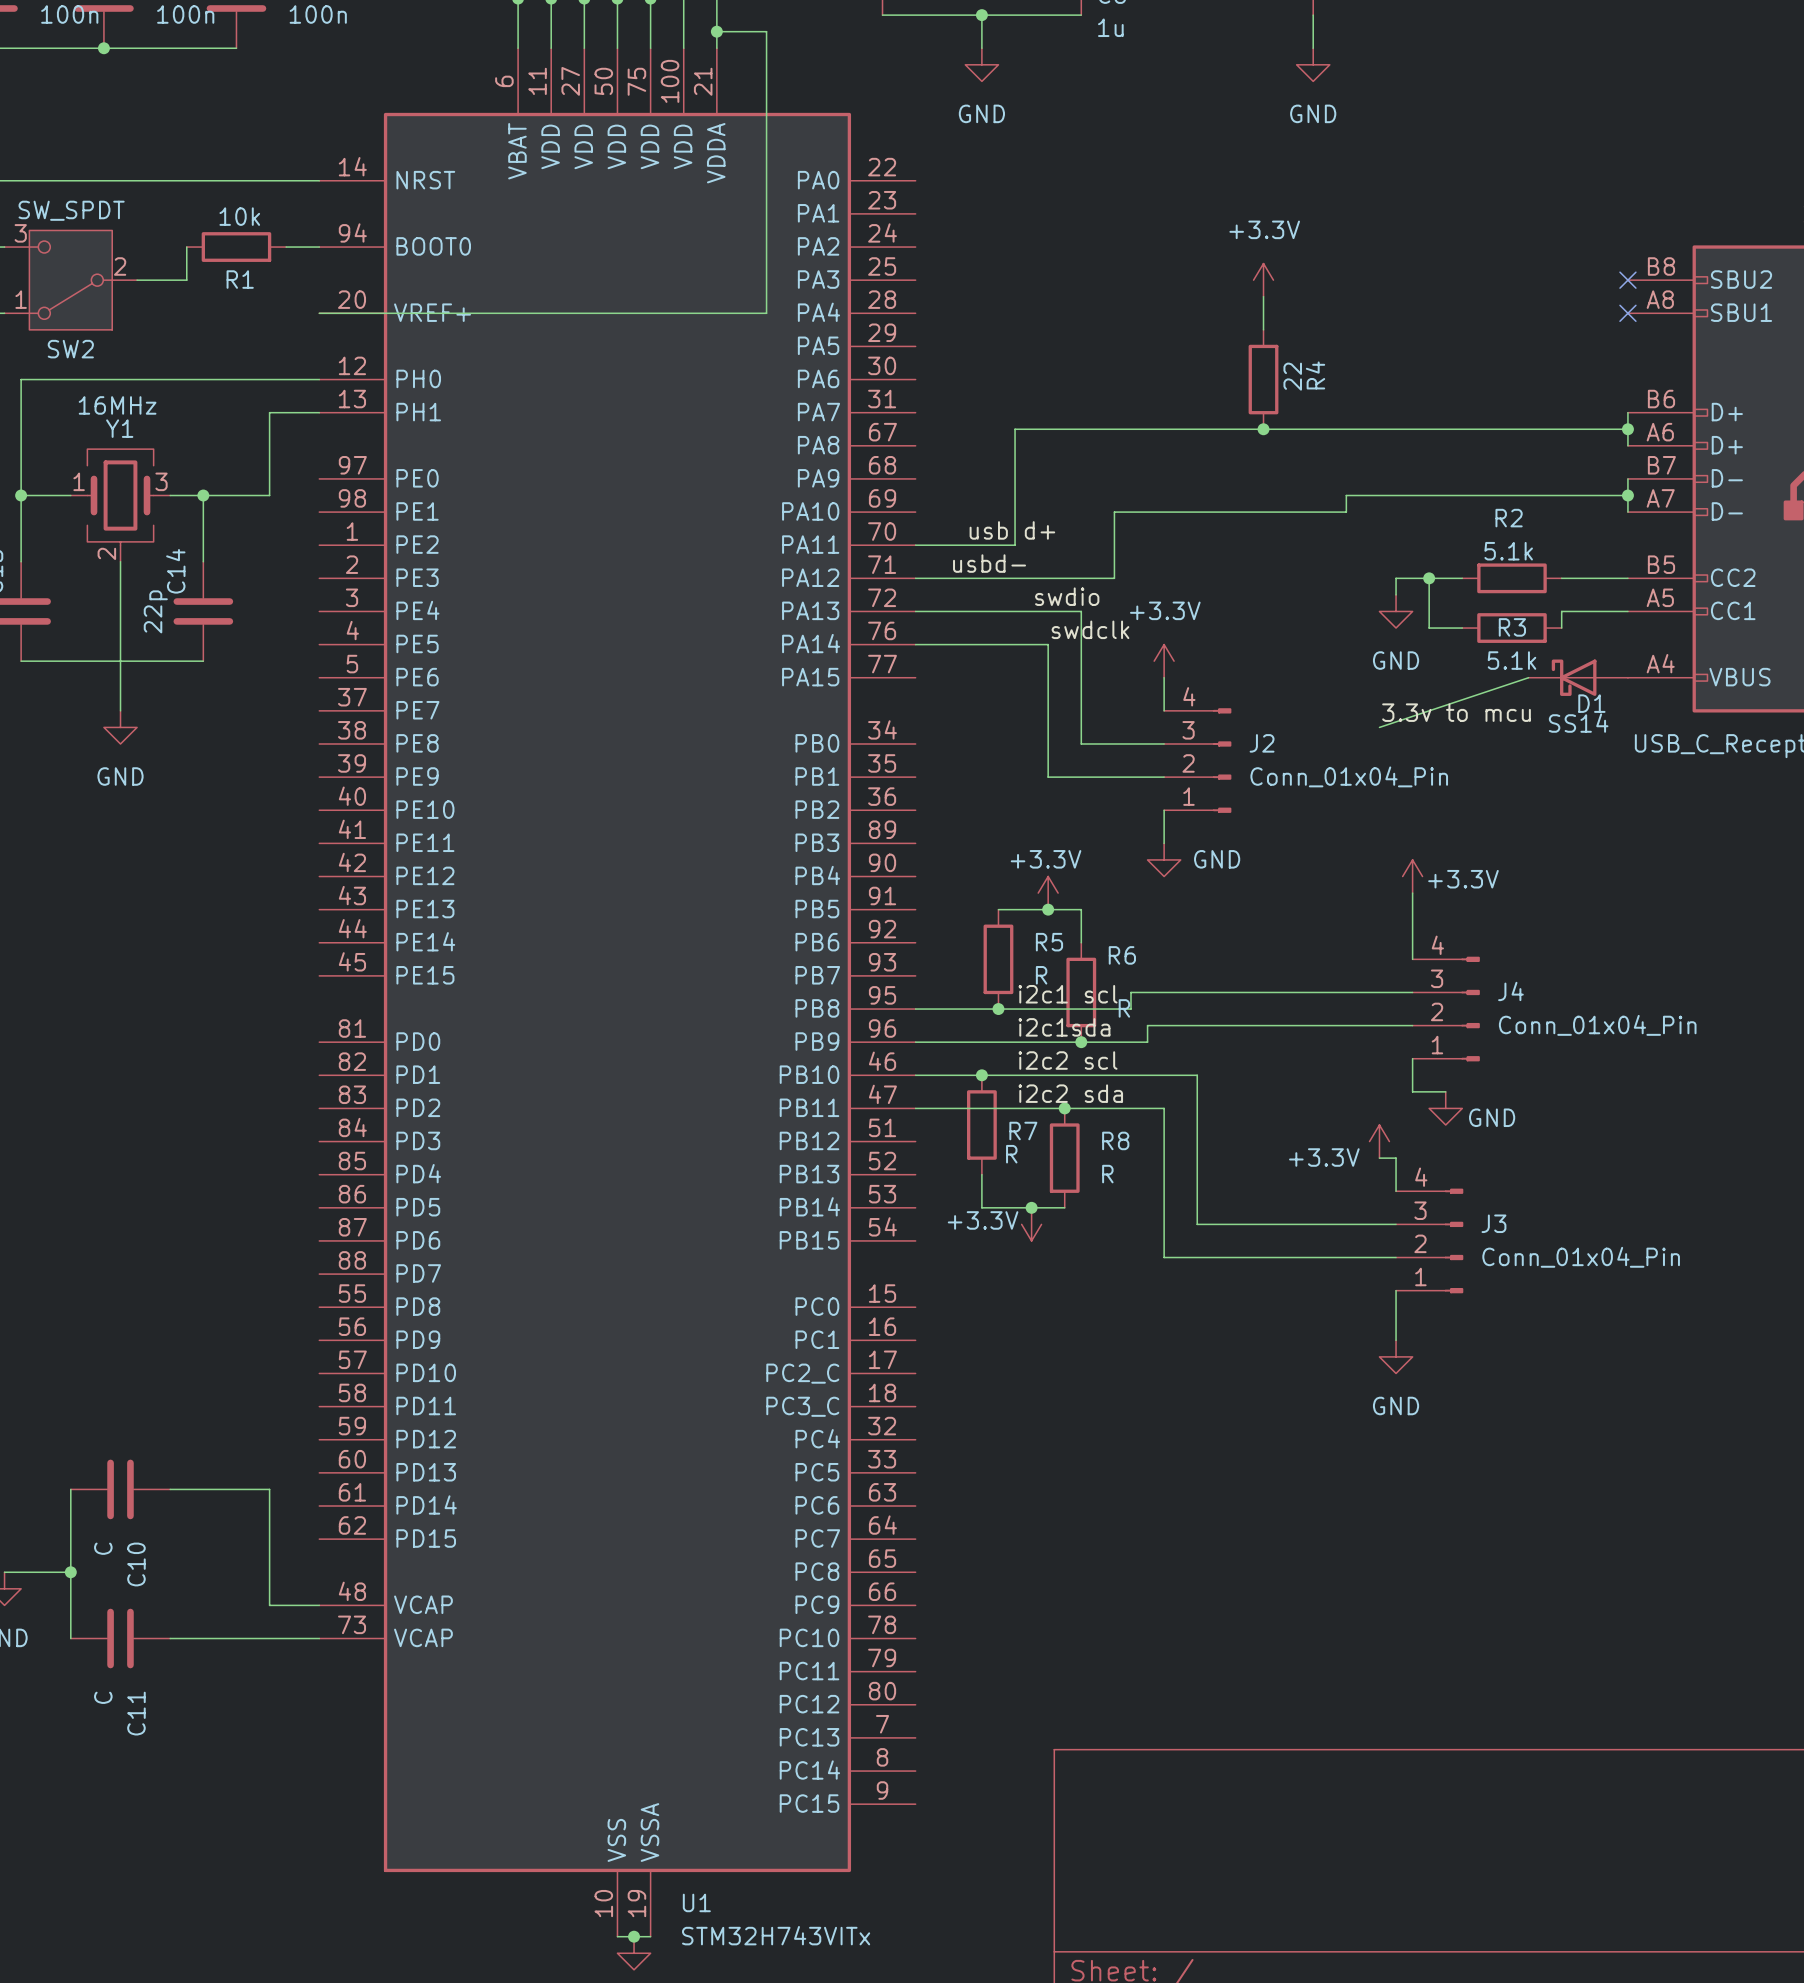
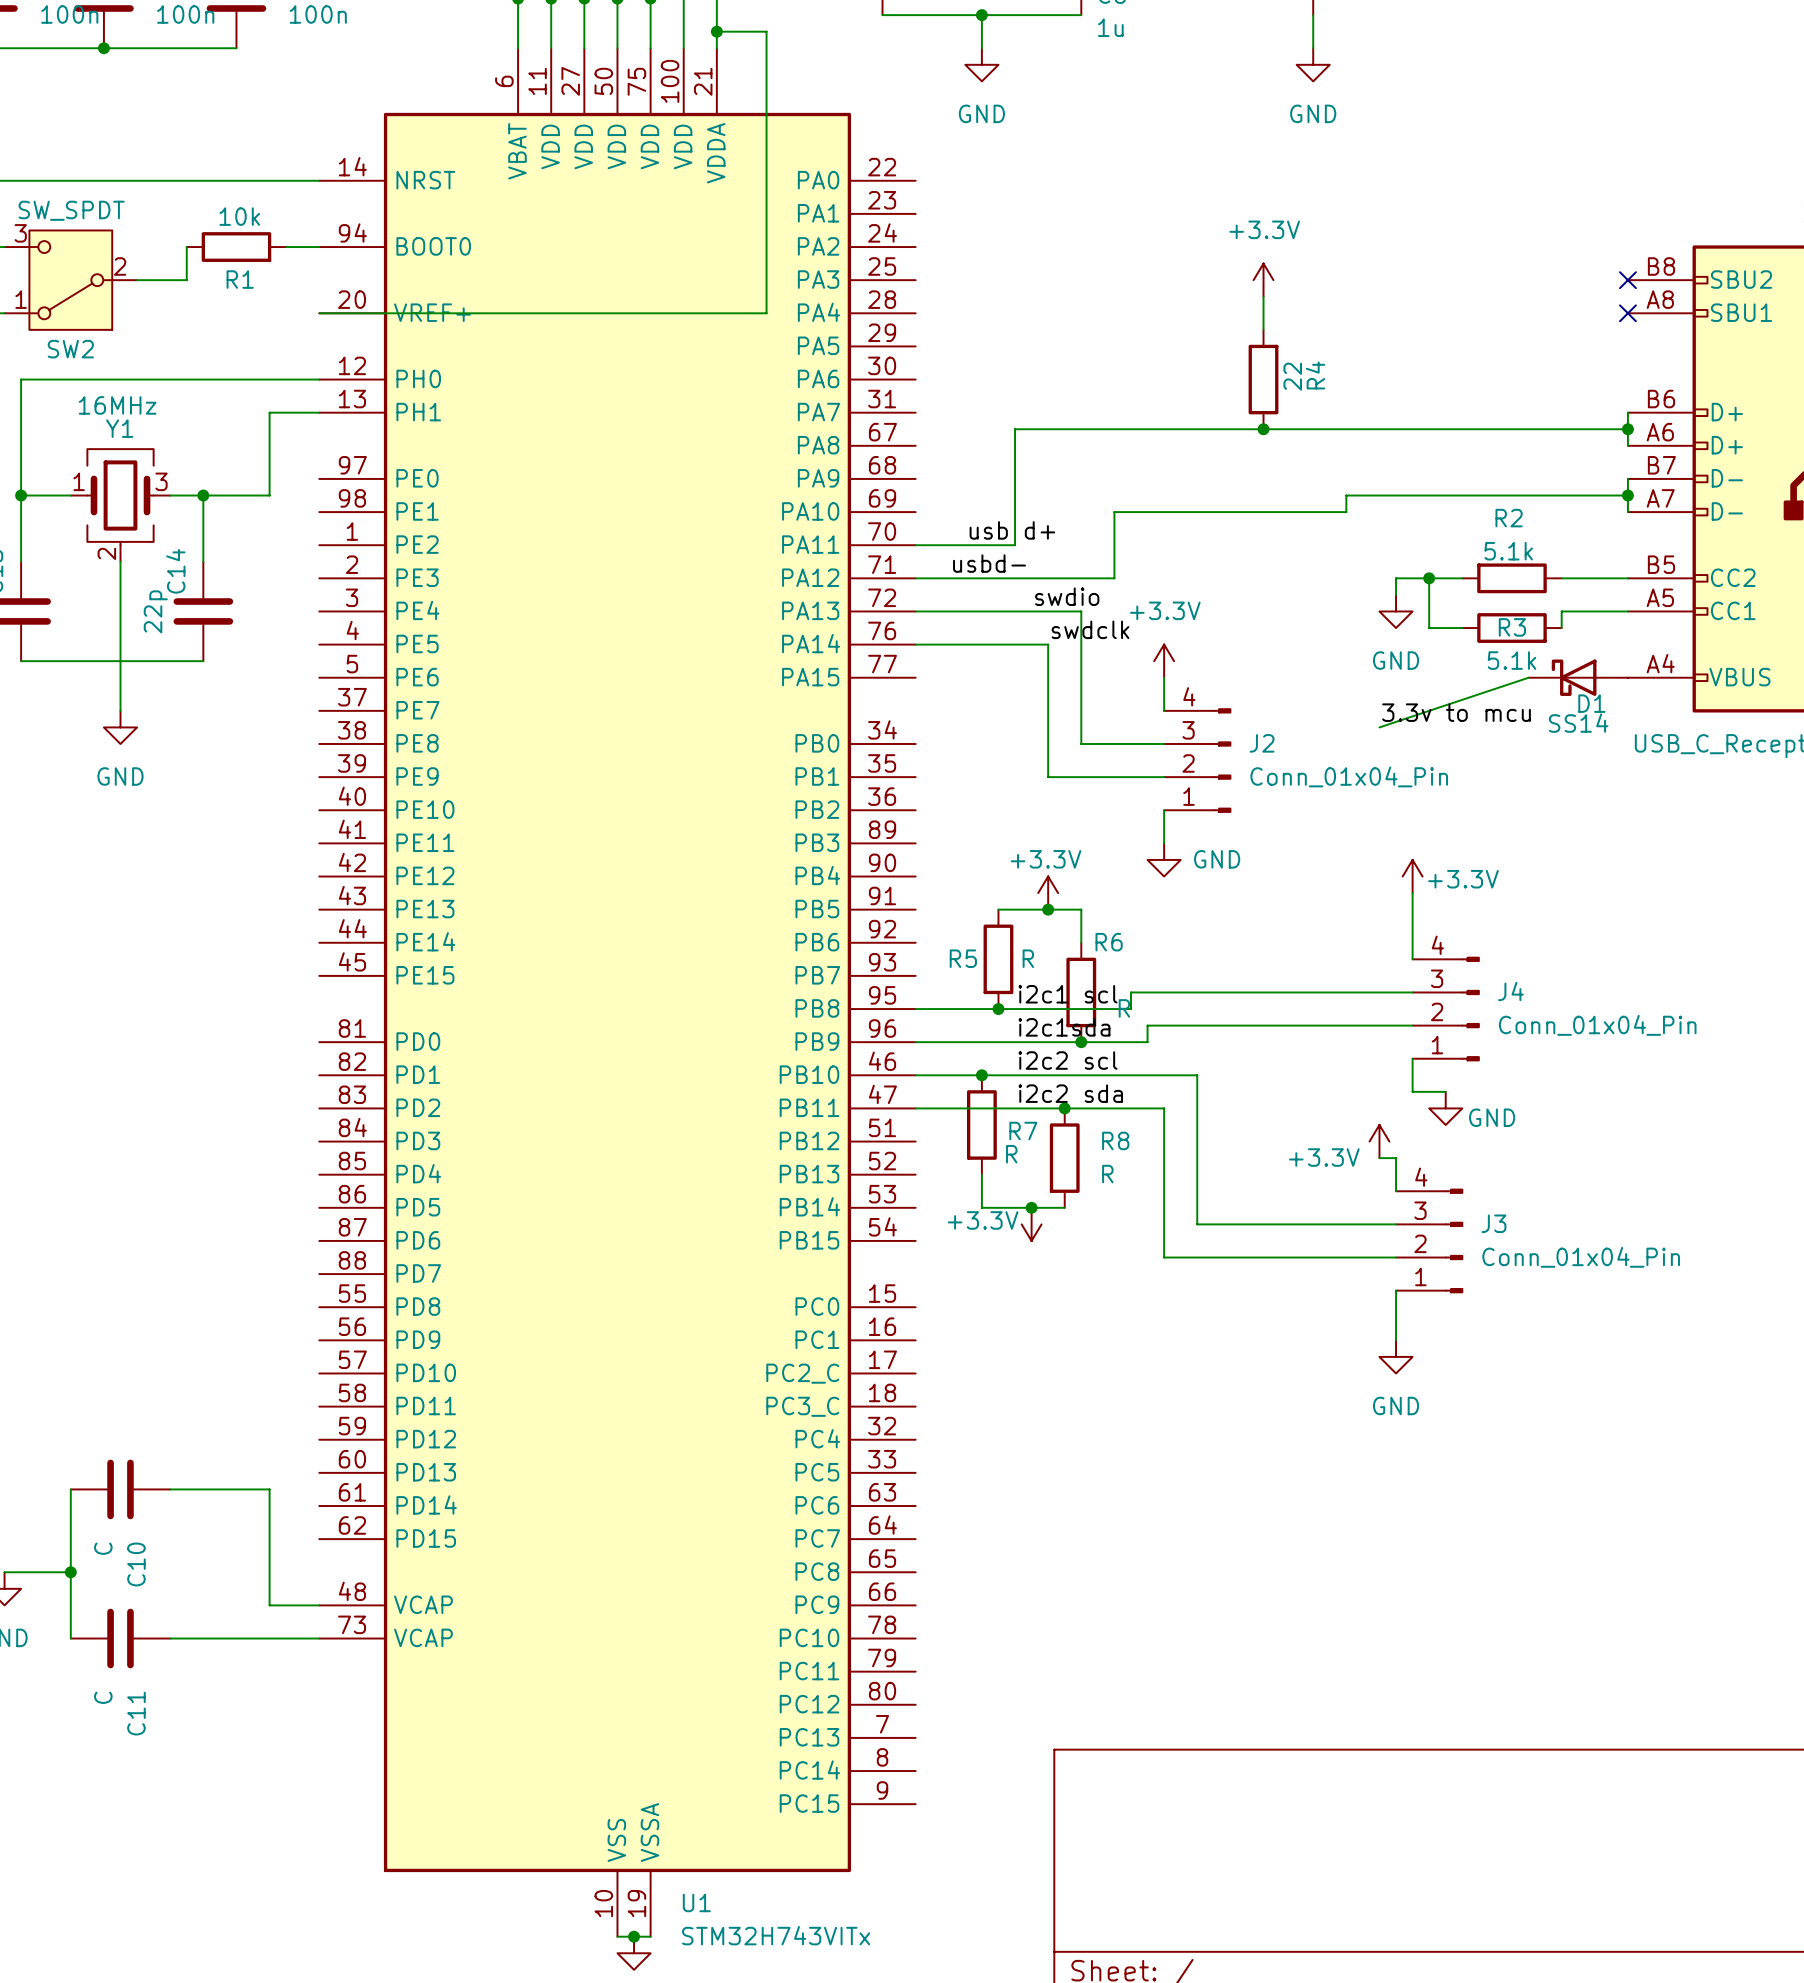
R5 name position: R5 (1049, 942) -> R5 (963, 958)
R6 name position: R6 (1122, 955) -> R6 (1109, 942)
R5 value position: R (1041, 975) -> R (1028, 958)

